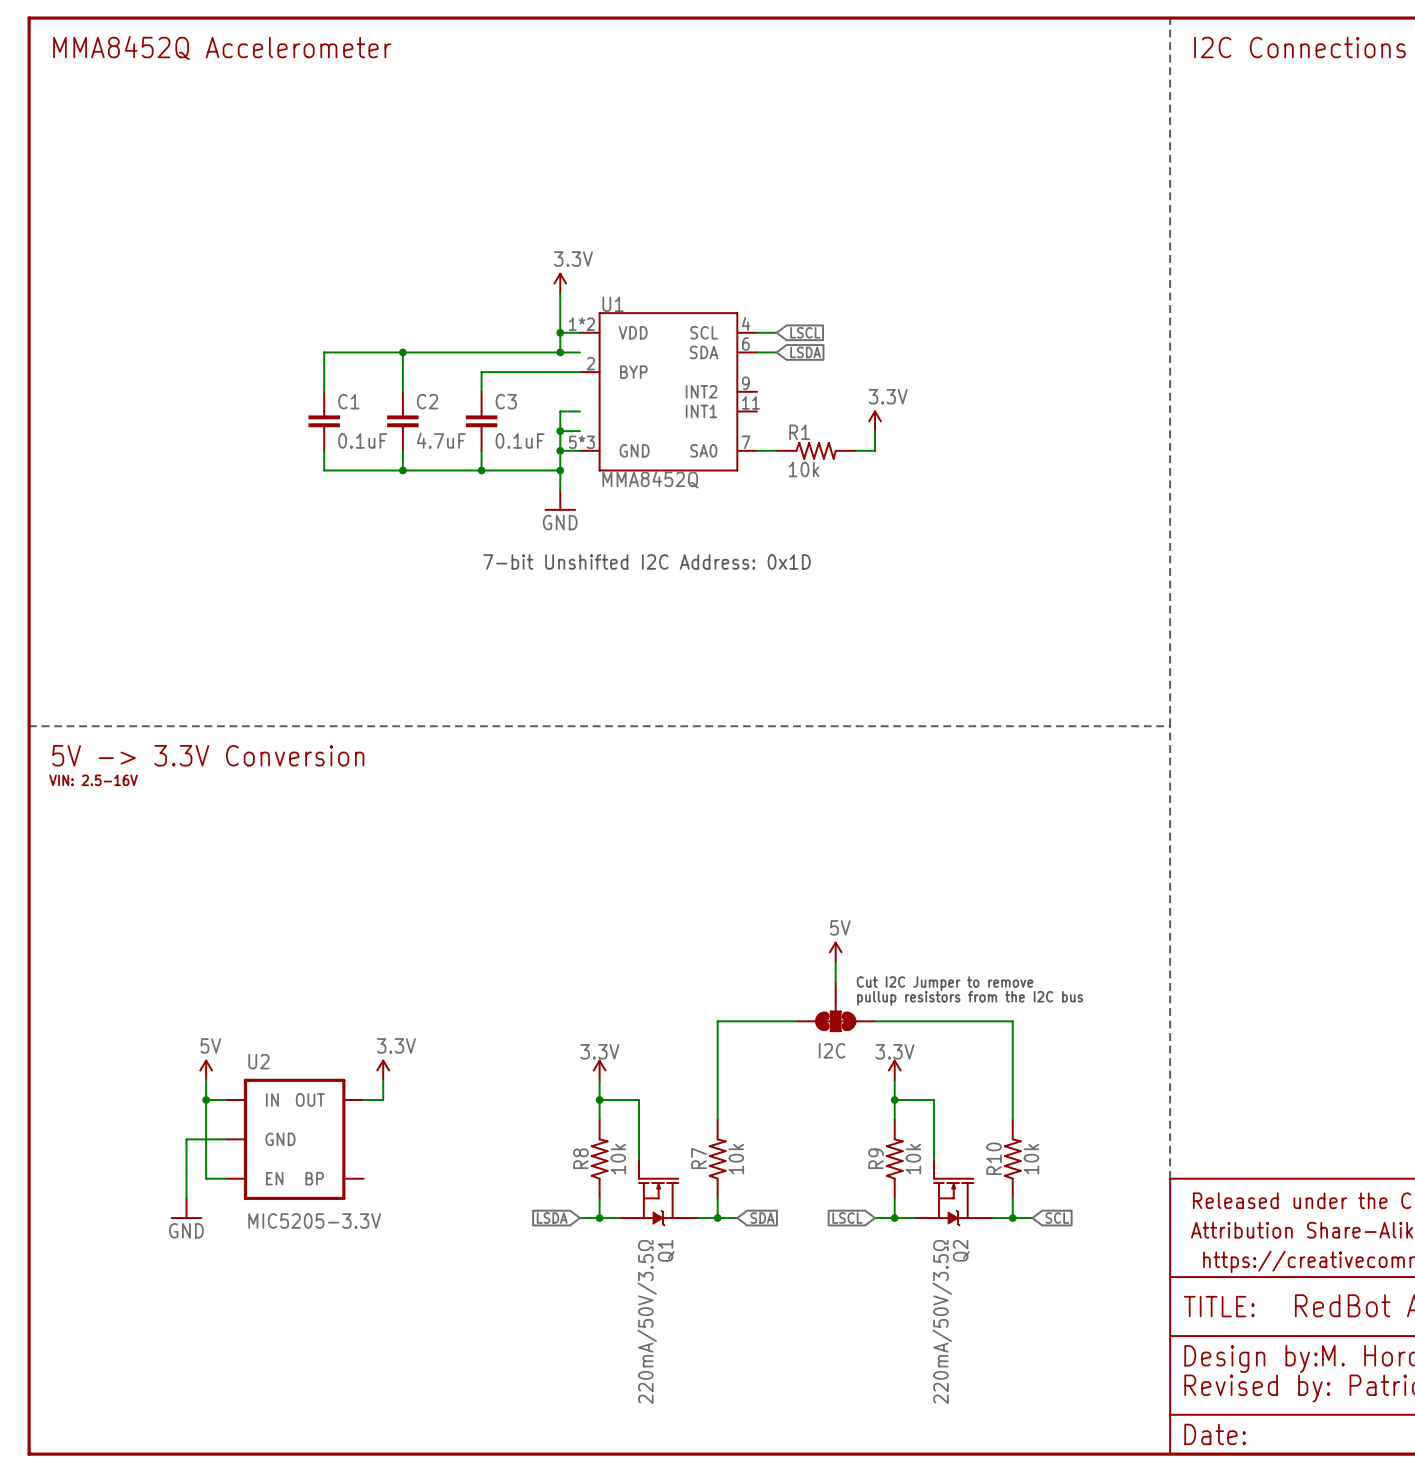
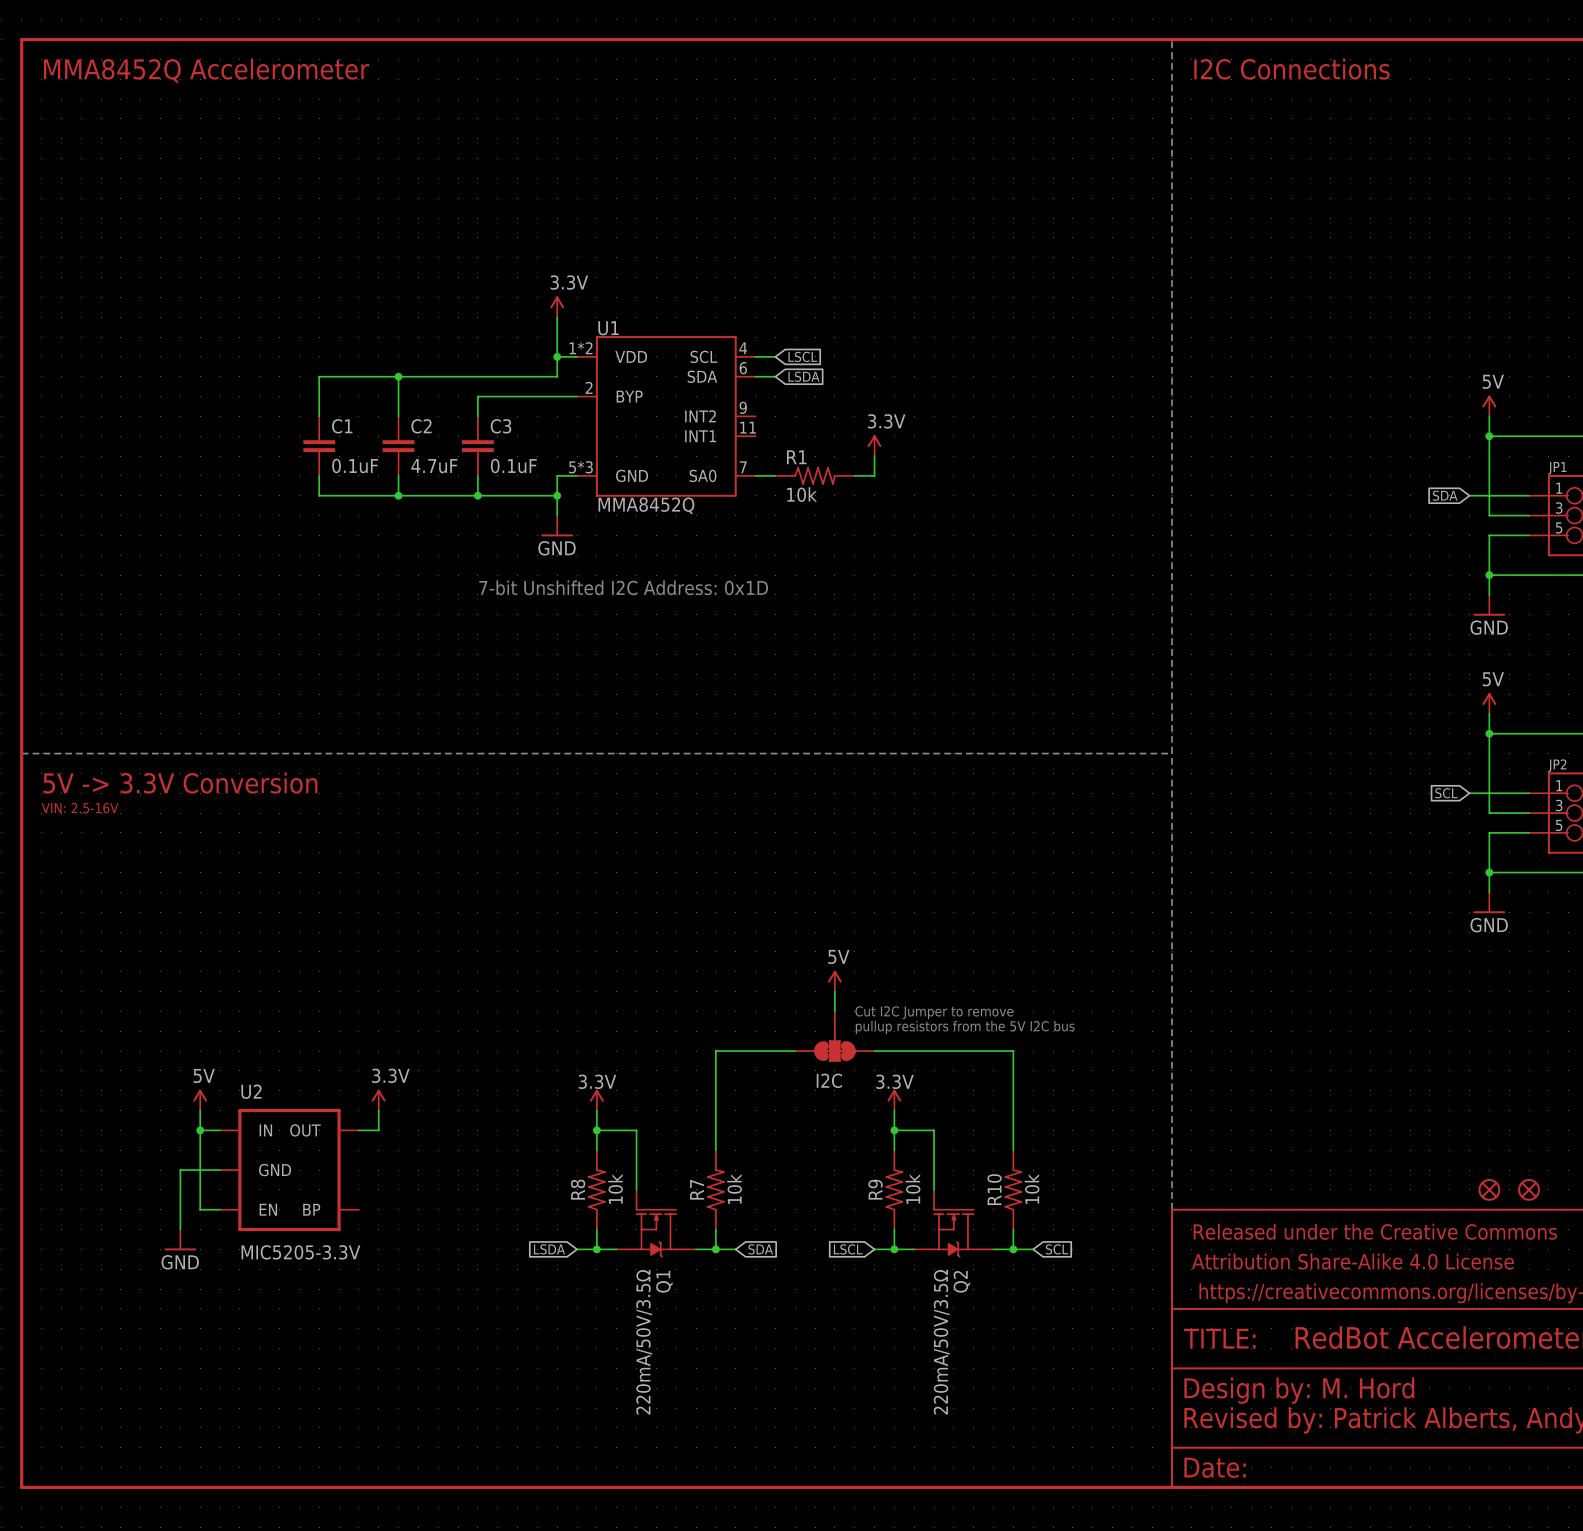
wire: (560, 352) (579, 352) -> none
junction: (560, 352) -> none
wire: (579, 411) (560, 411) (560, 450) -> none
wire: (560, 431) (579, 431) -> none
junction: (560, 431) -> none
junction: (560, 450) -> none
text: pullup resistors from the I2C bus (970, 998) -> pullup resistors from the 5V I2C bus (965, 1027)

